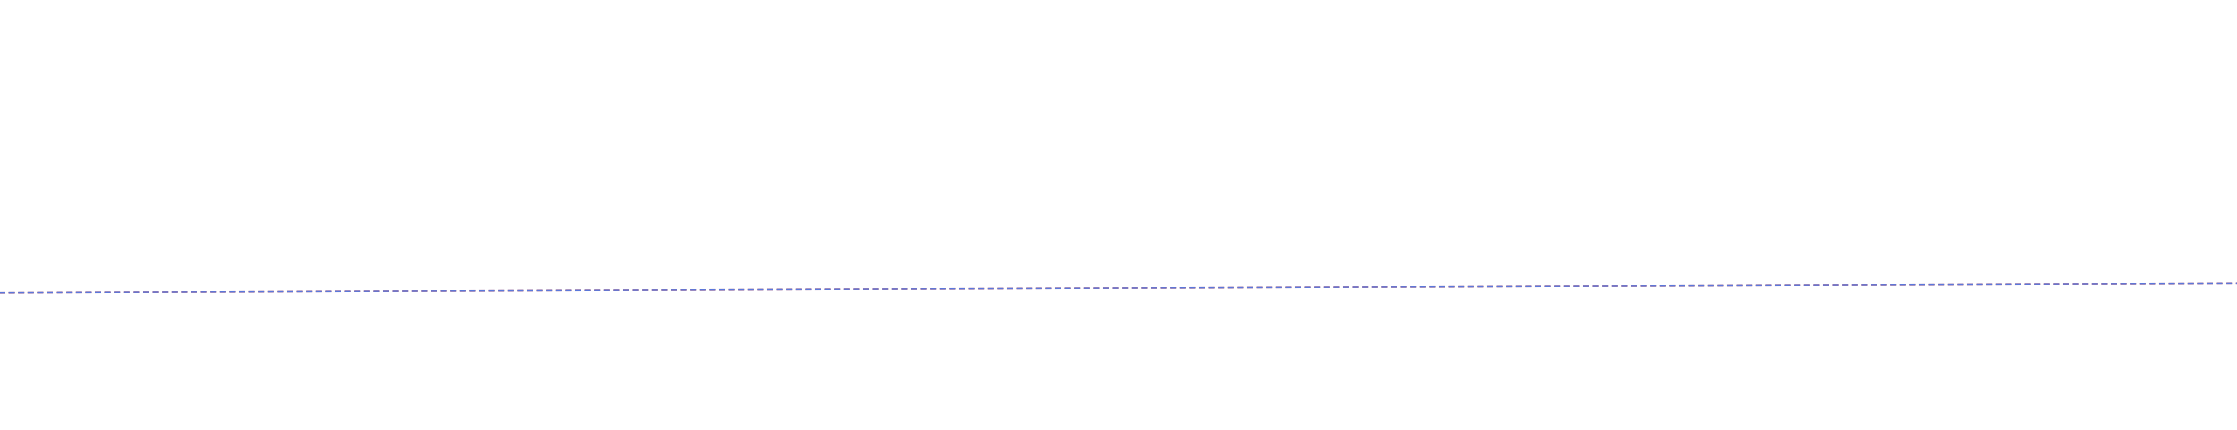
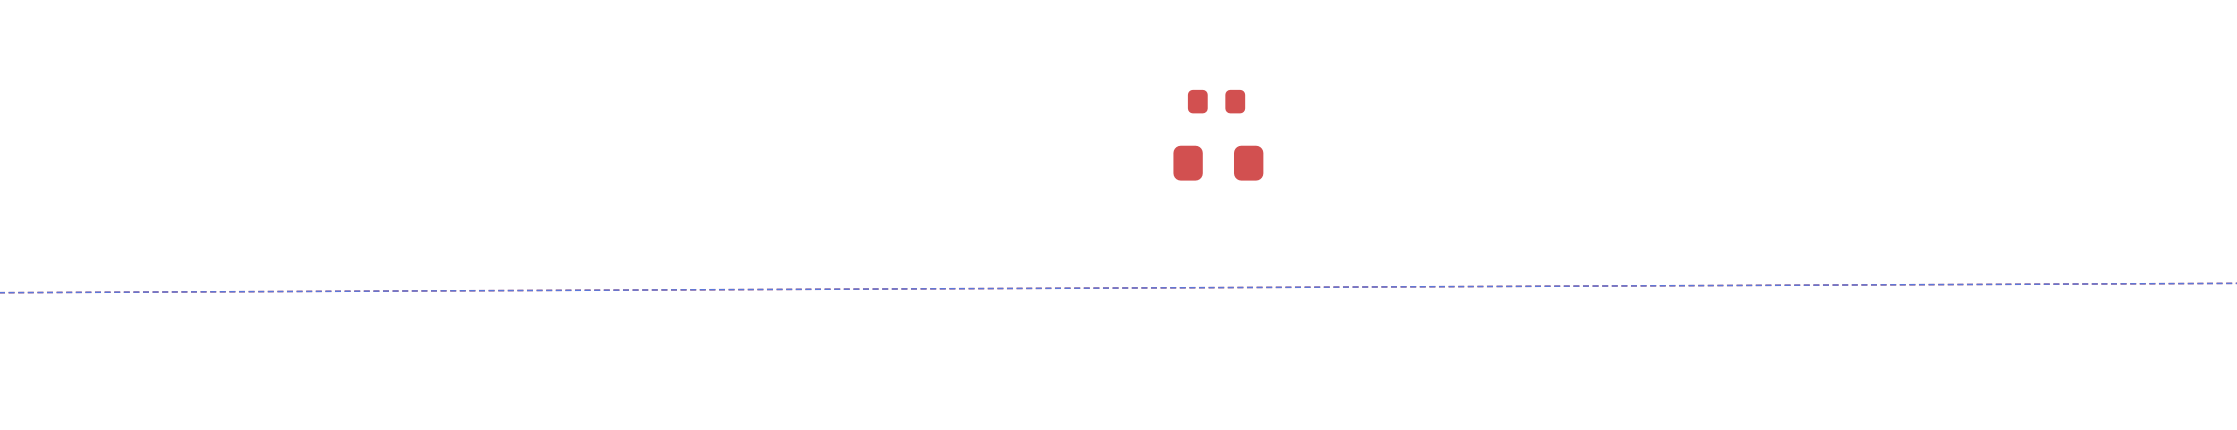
part: none -> (1216, 101)
part: none -> (1218, 163)

